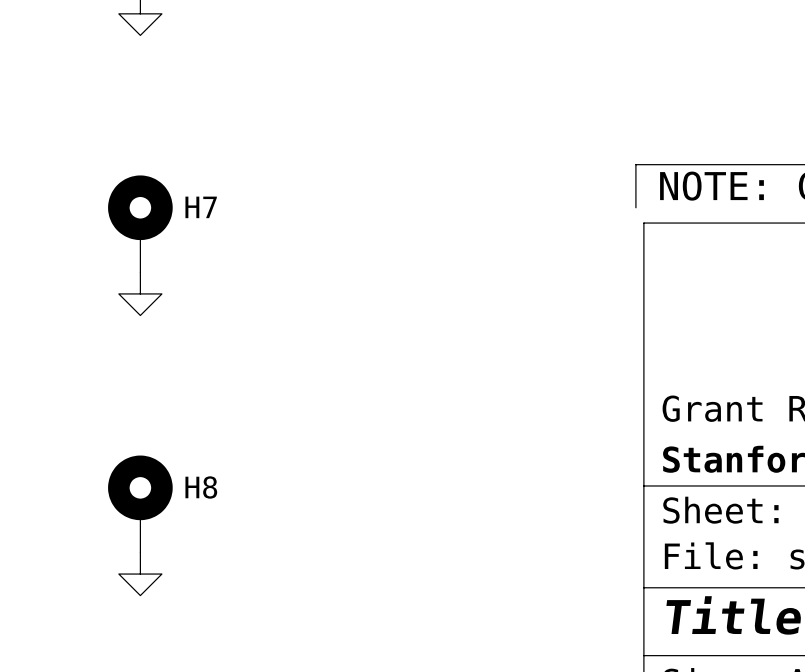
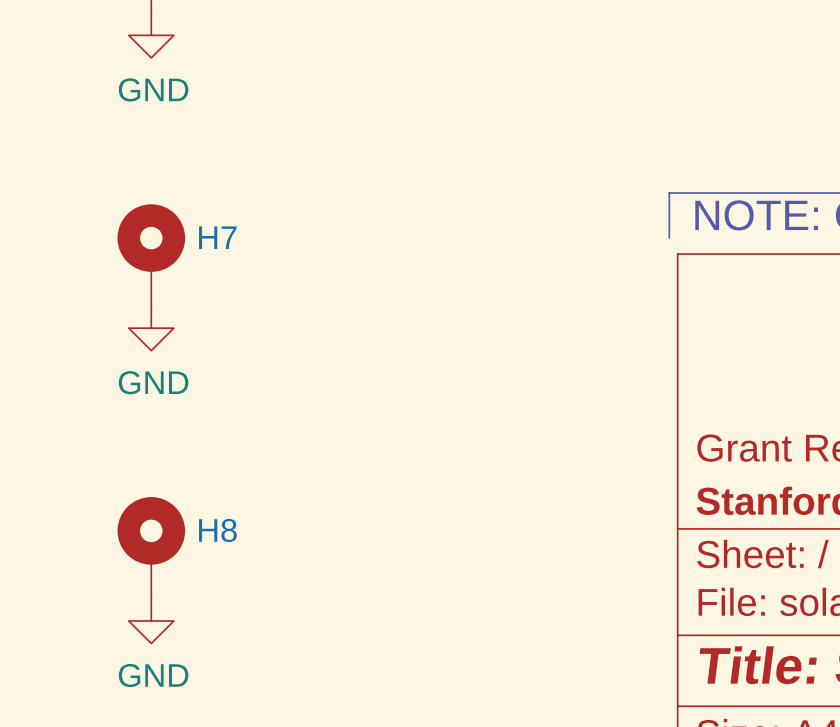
power symbol text: none -> GND (153, 89)
power symbol text: none -> GND (153, 382)
power symbol text: none -> GND (153, 675)

